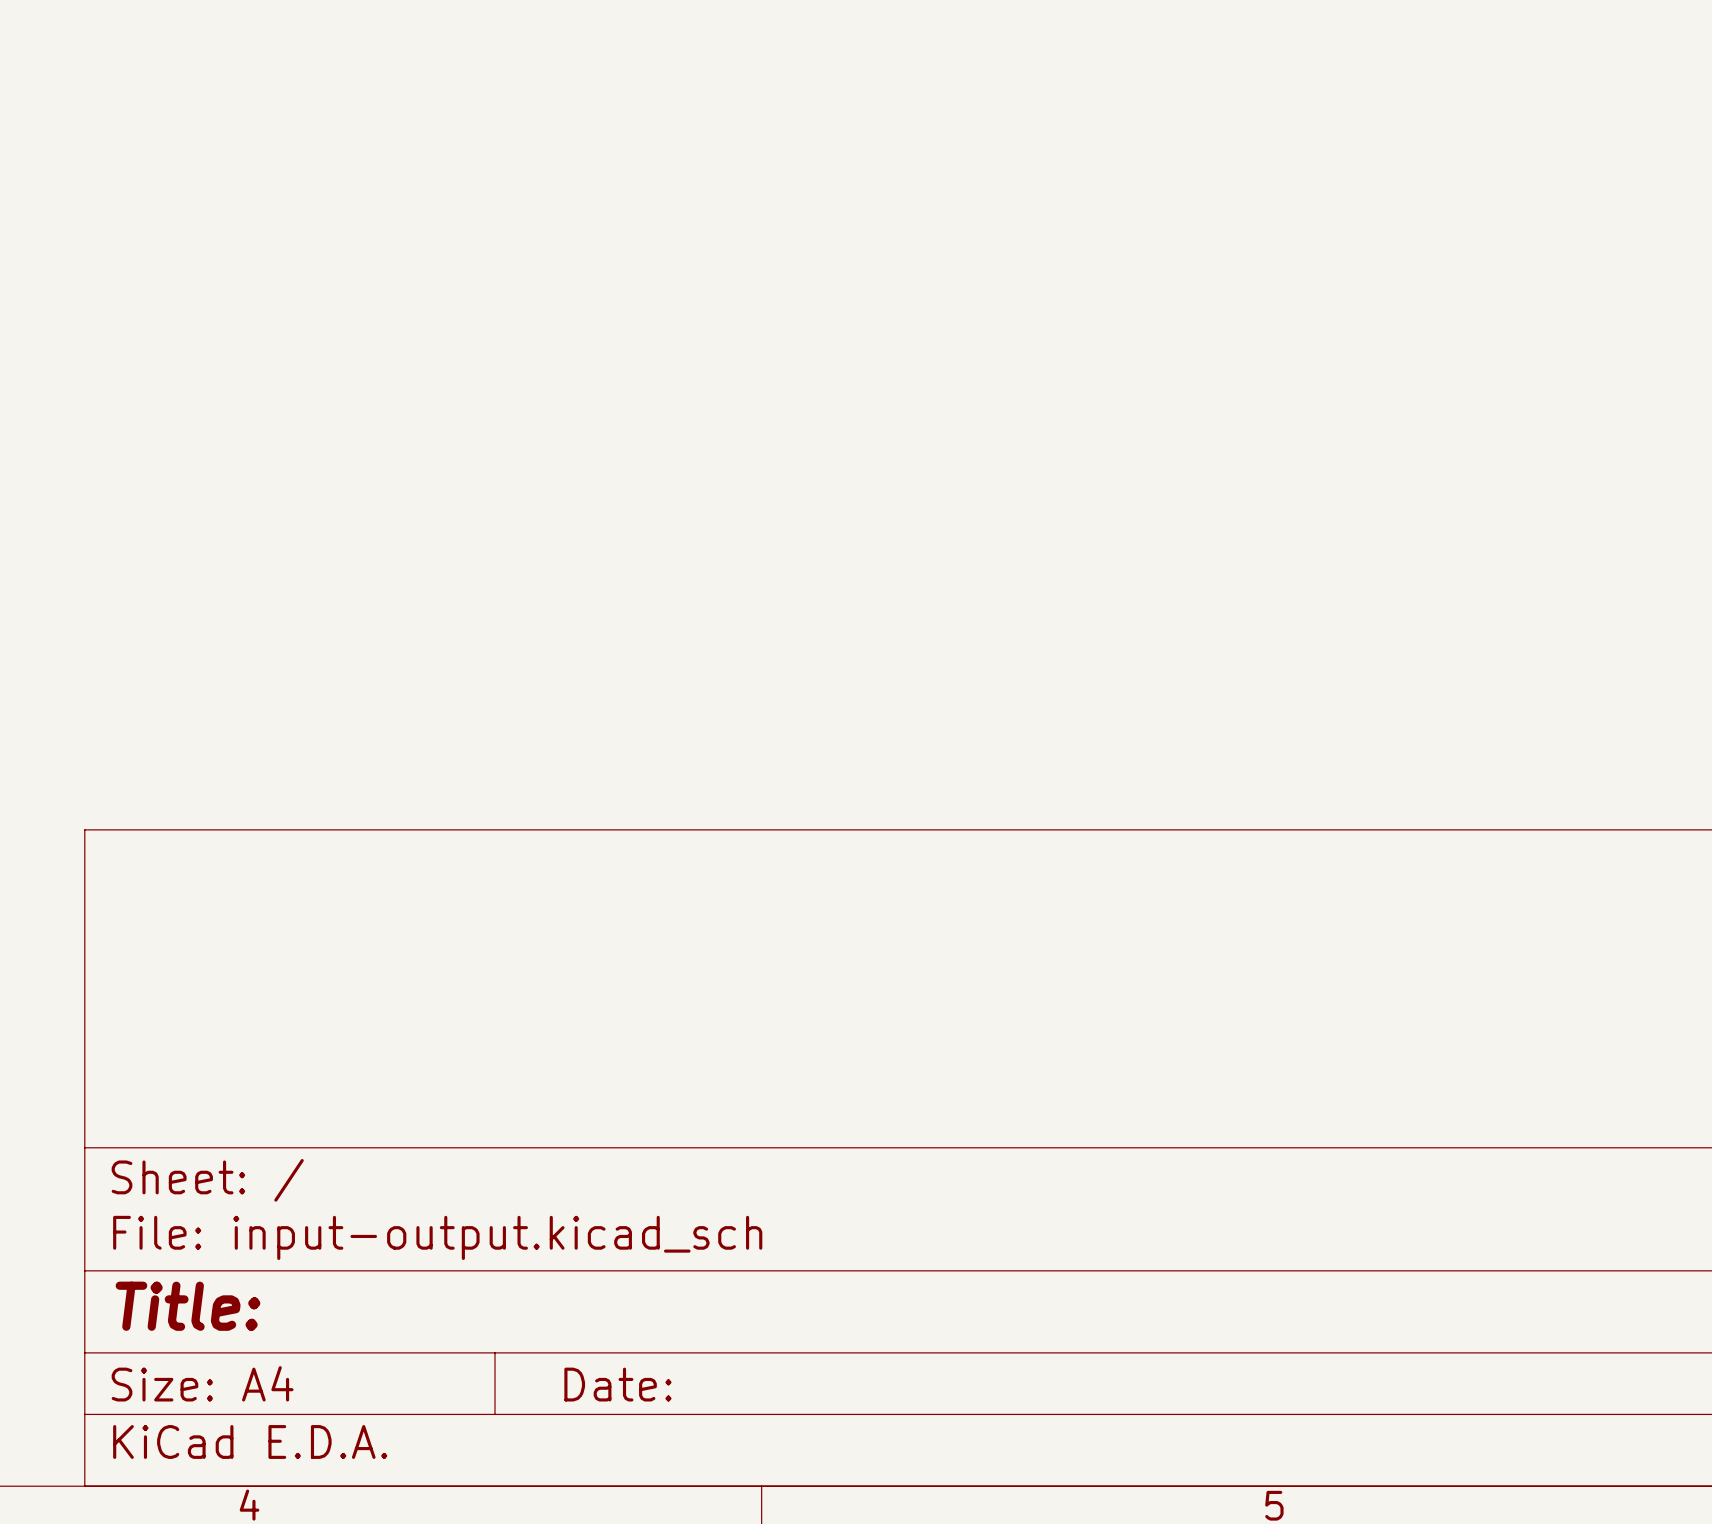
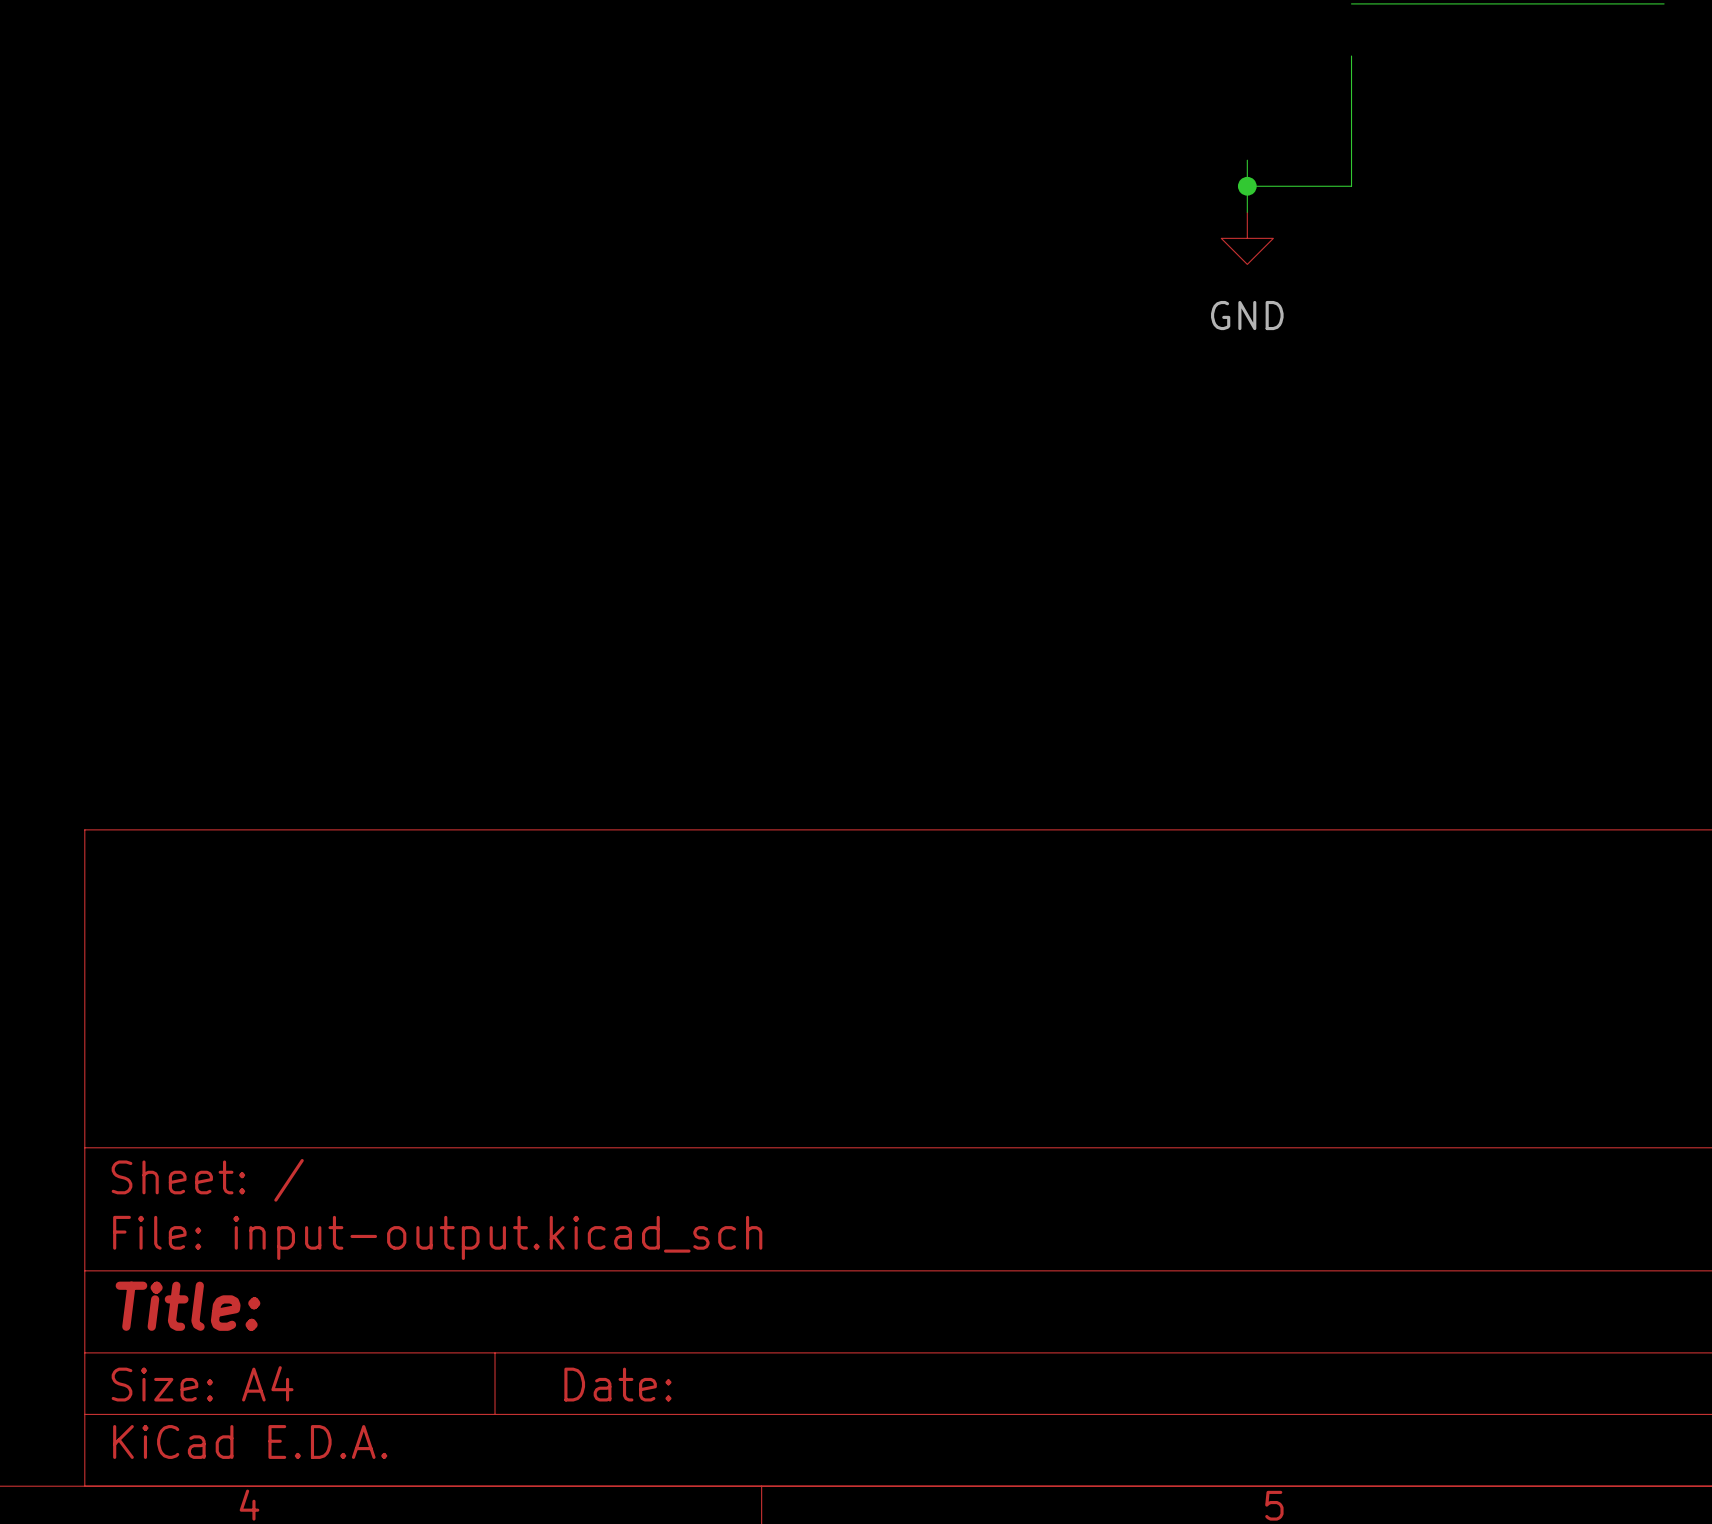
wire: none -> (1351, 3) (1664, 3)
wire: none -> (1351, 56) (1351, 186) (1247, 186)
wire: none -> (1247, 160) (1247, 212)
junction: none -> (1247, 186)
power symbol: none -> GND (1247, 238)

